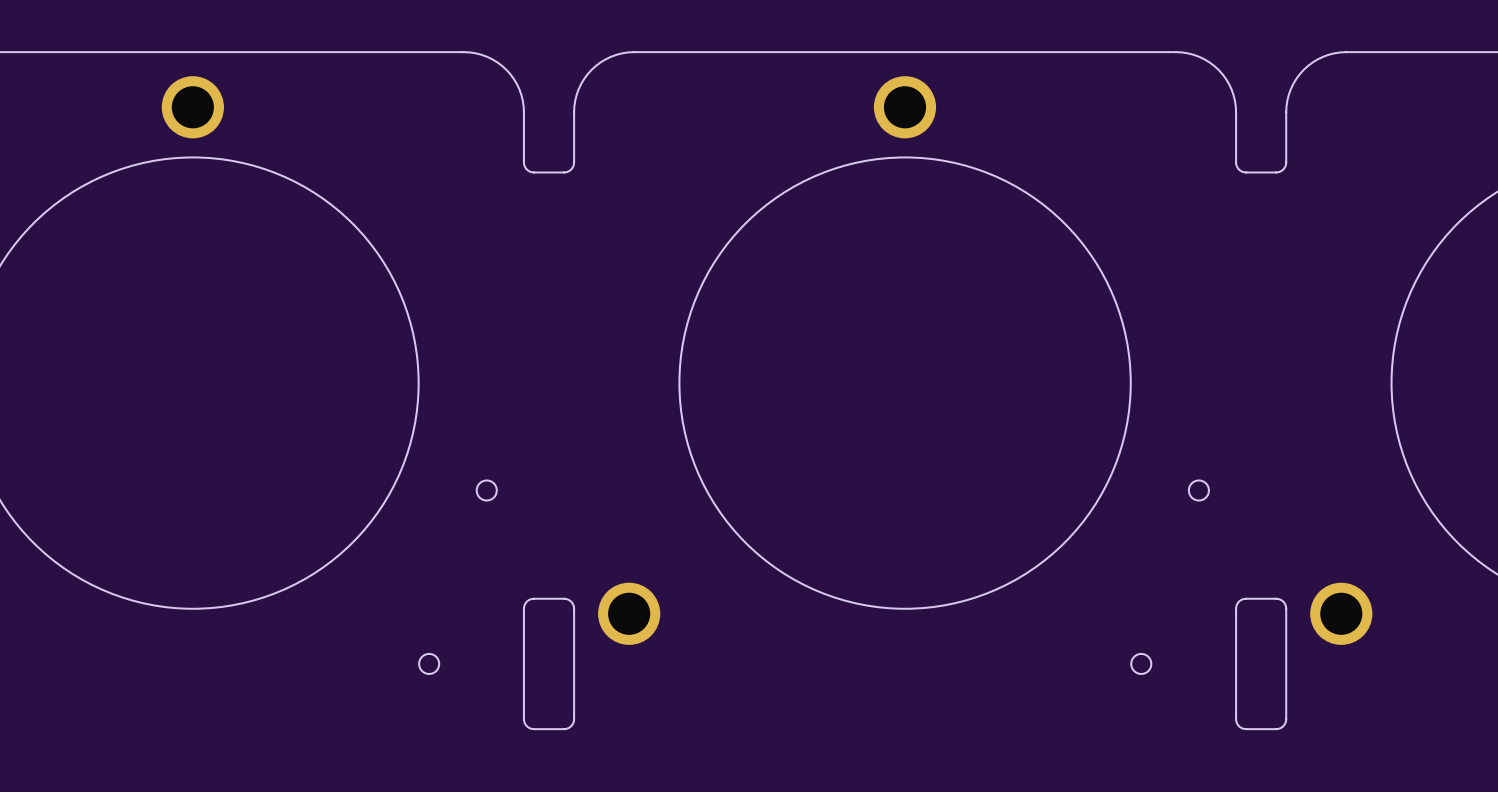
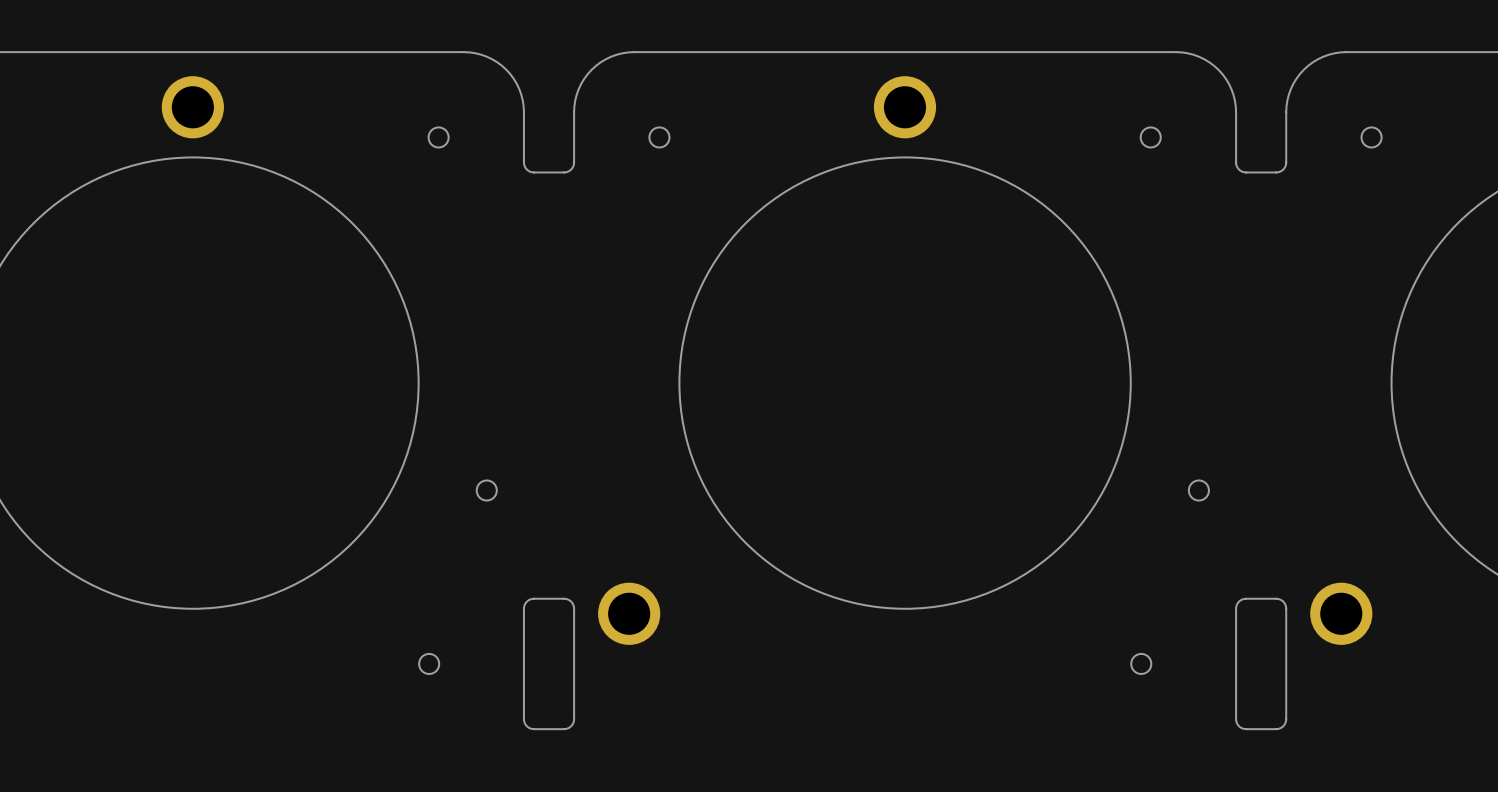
round board edge: none -> [427, 126, 450, 149]
round board edge: none -> [648, 126, 671, 149]
round board edge: none -> [1139, 126, 1162, 149]
round board edge: none -> [1360, 126, 1383, 149]

